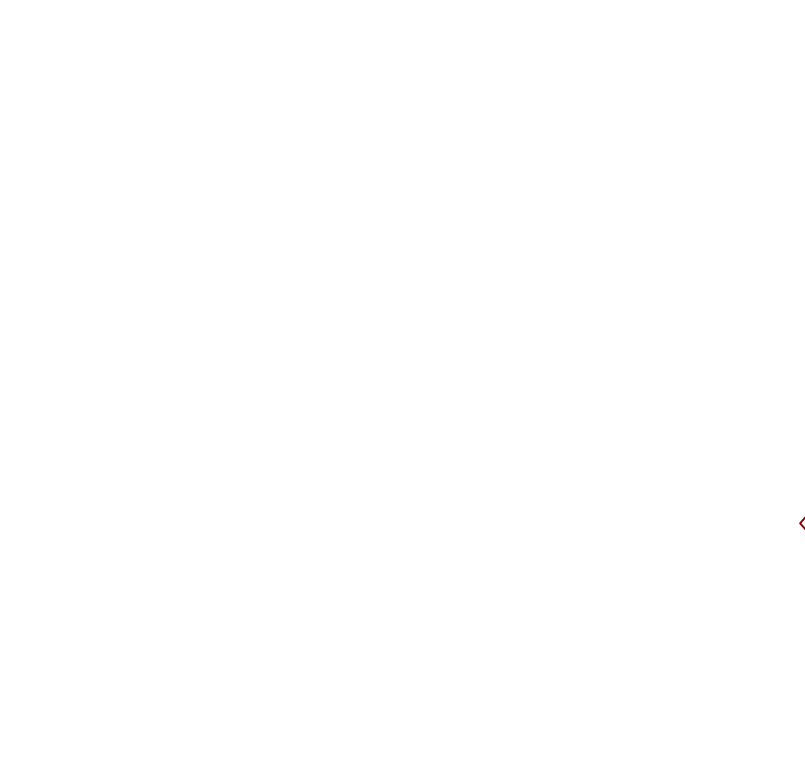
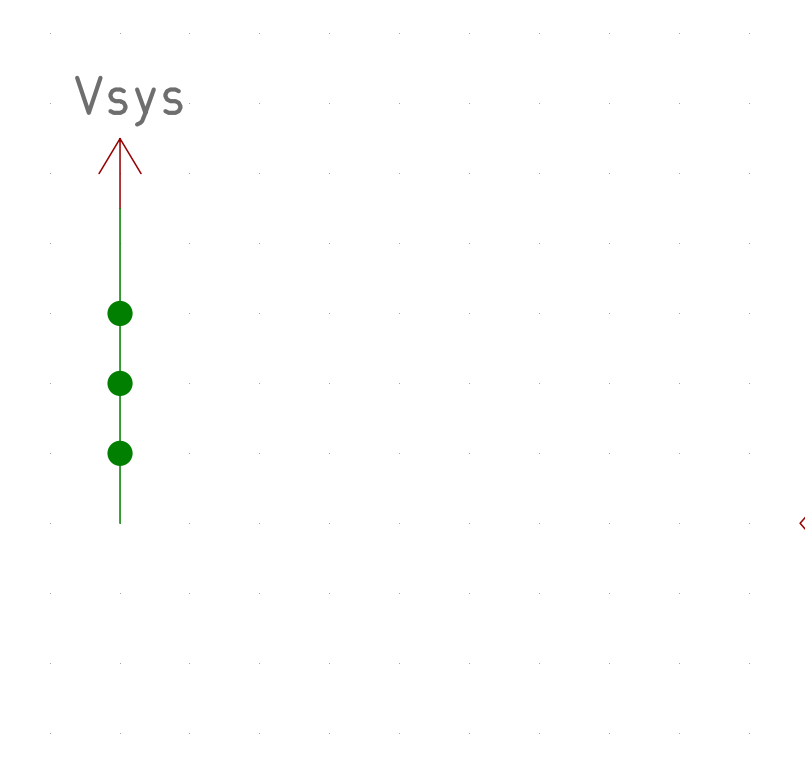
power symbol: none -> Vsys (120, 173)
wire: none -> (120, 208) (120, 523)
junction: none -> (120, 313)
junction: none -> (120, 383)
junction: none -> (120, 453)

